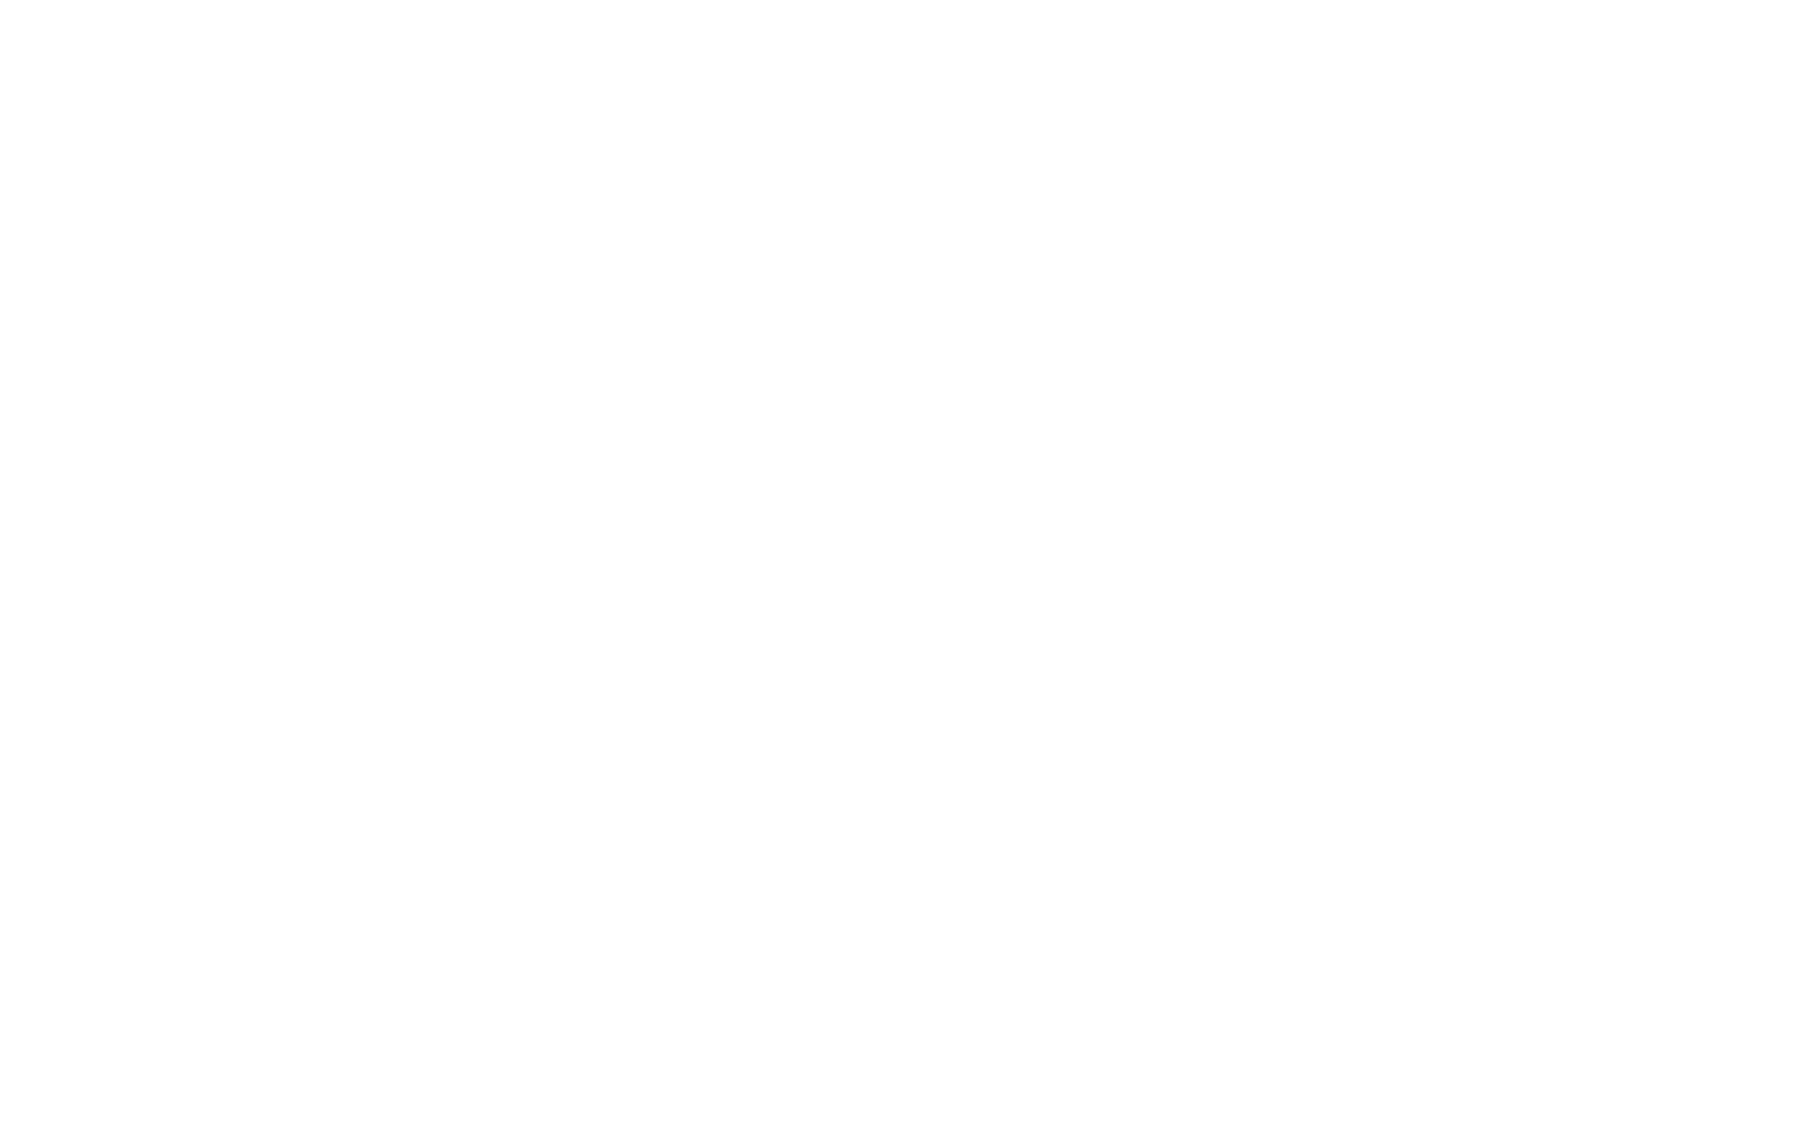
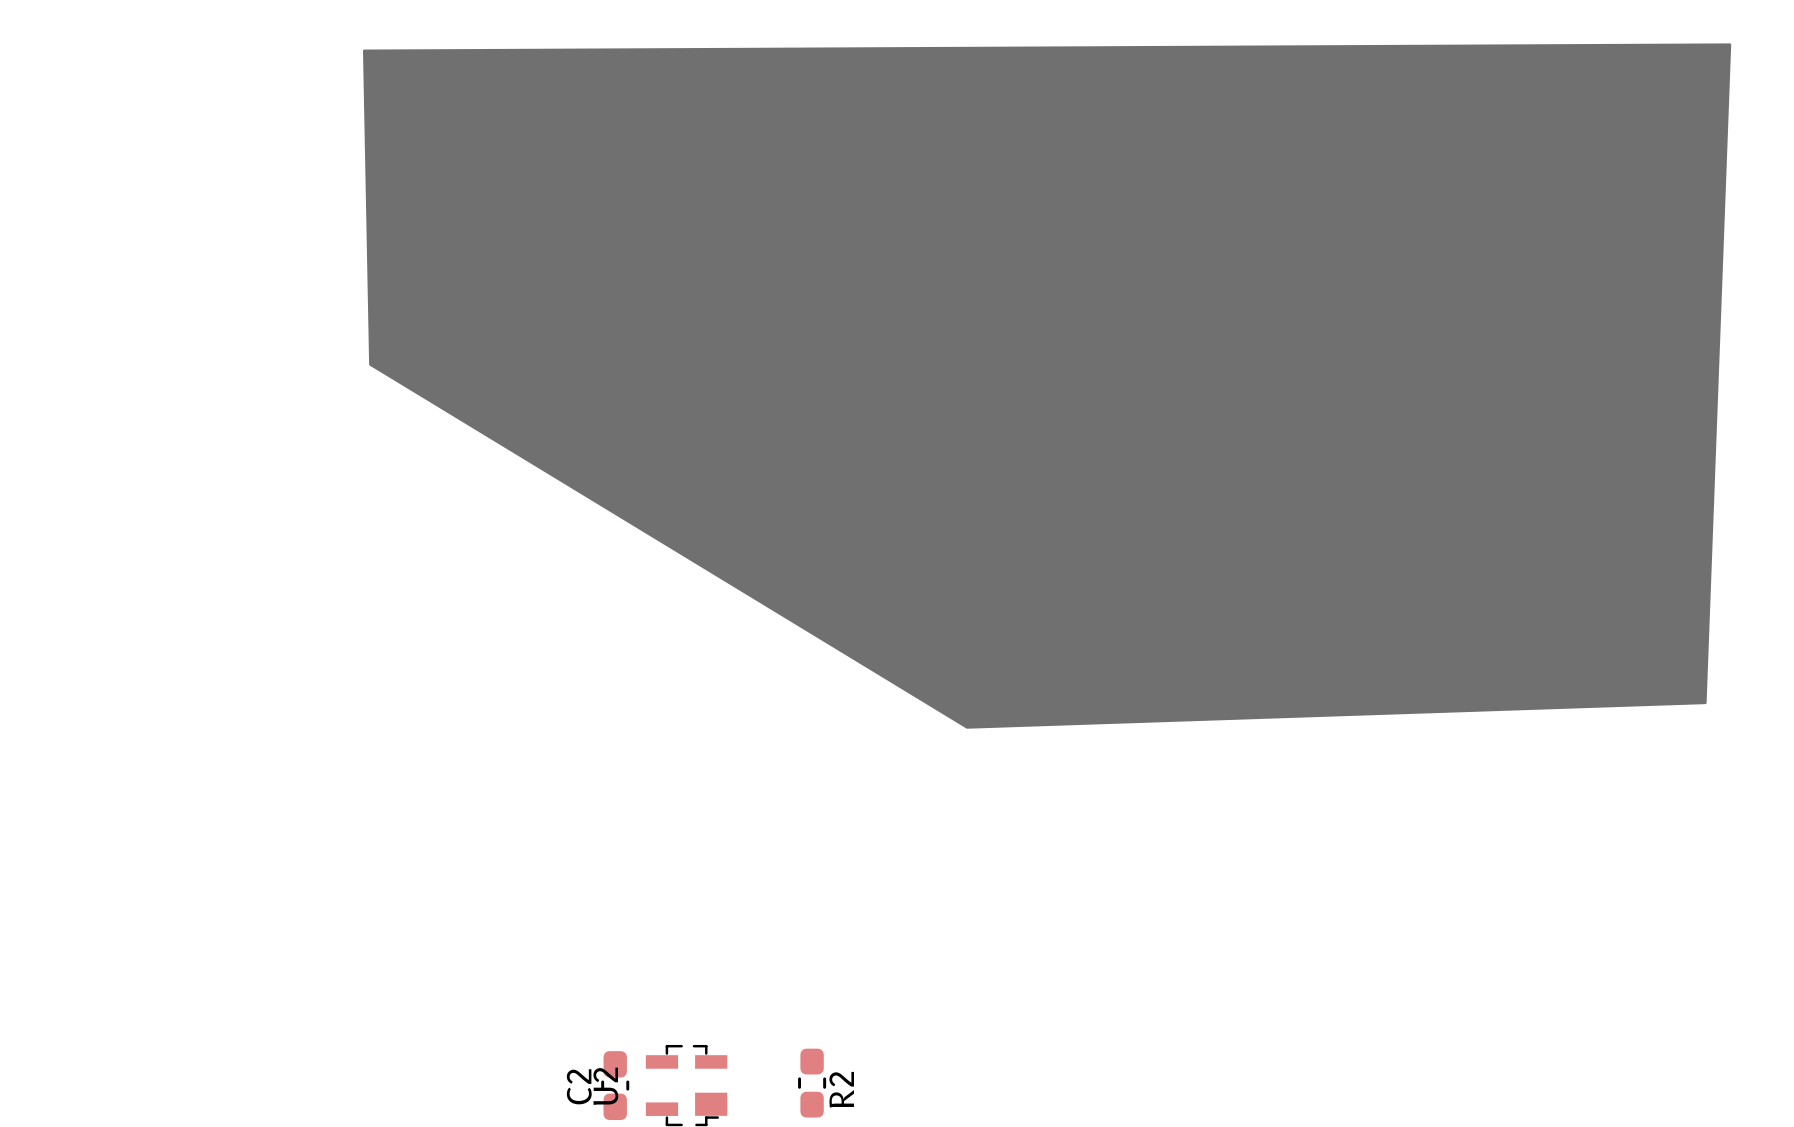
drawing: none -> [362, 43, 1732, 729]
R2: none -> (812, 1083)
C2: none -> (615, 1085)
U2: none -> (686, 1085)

